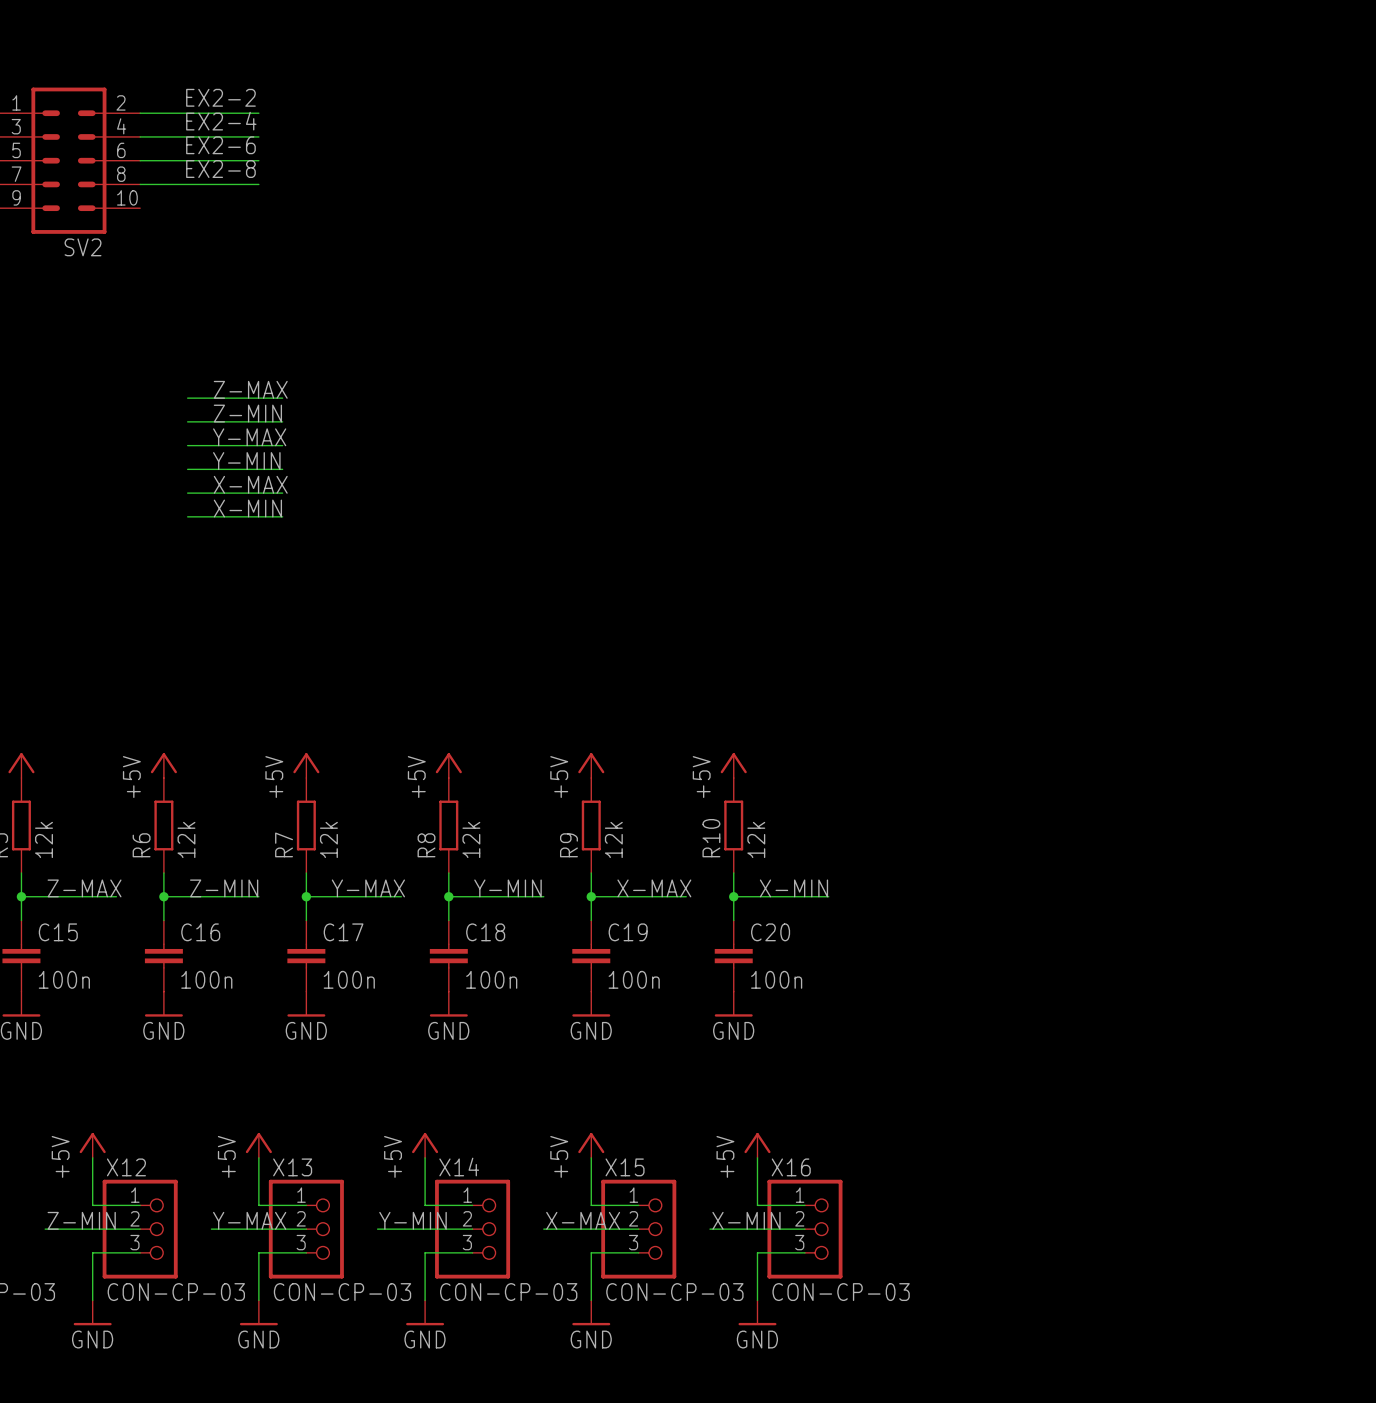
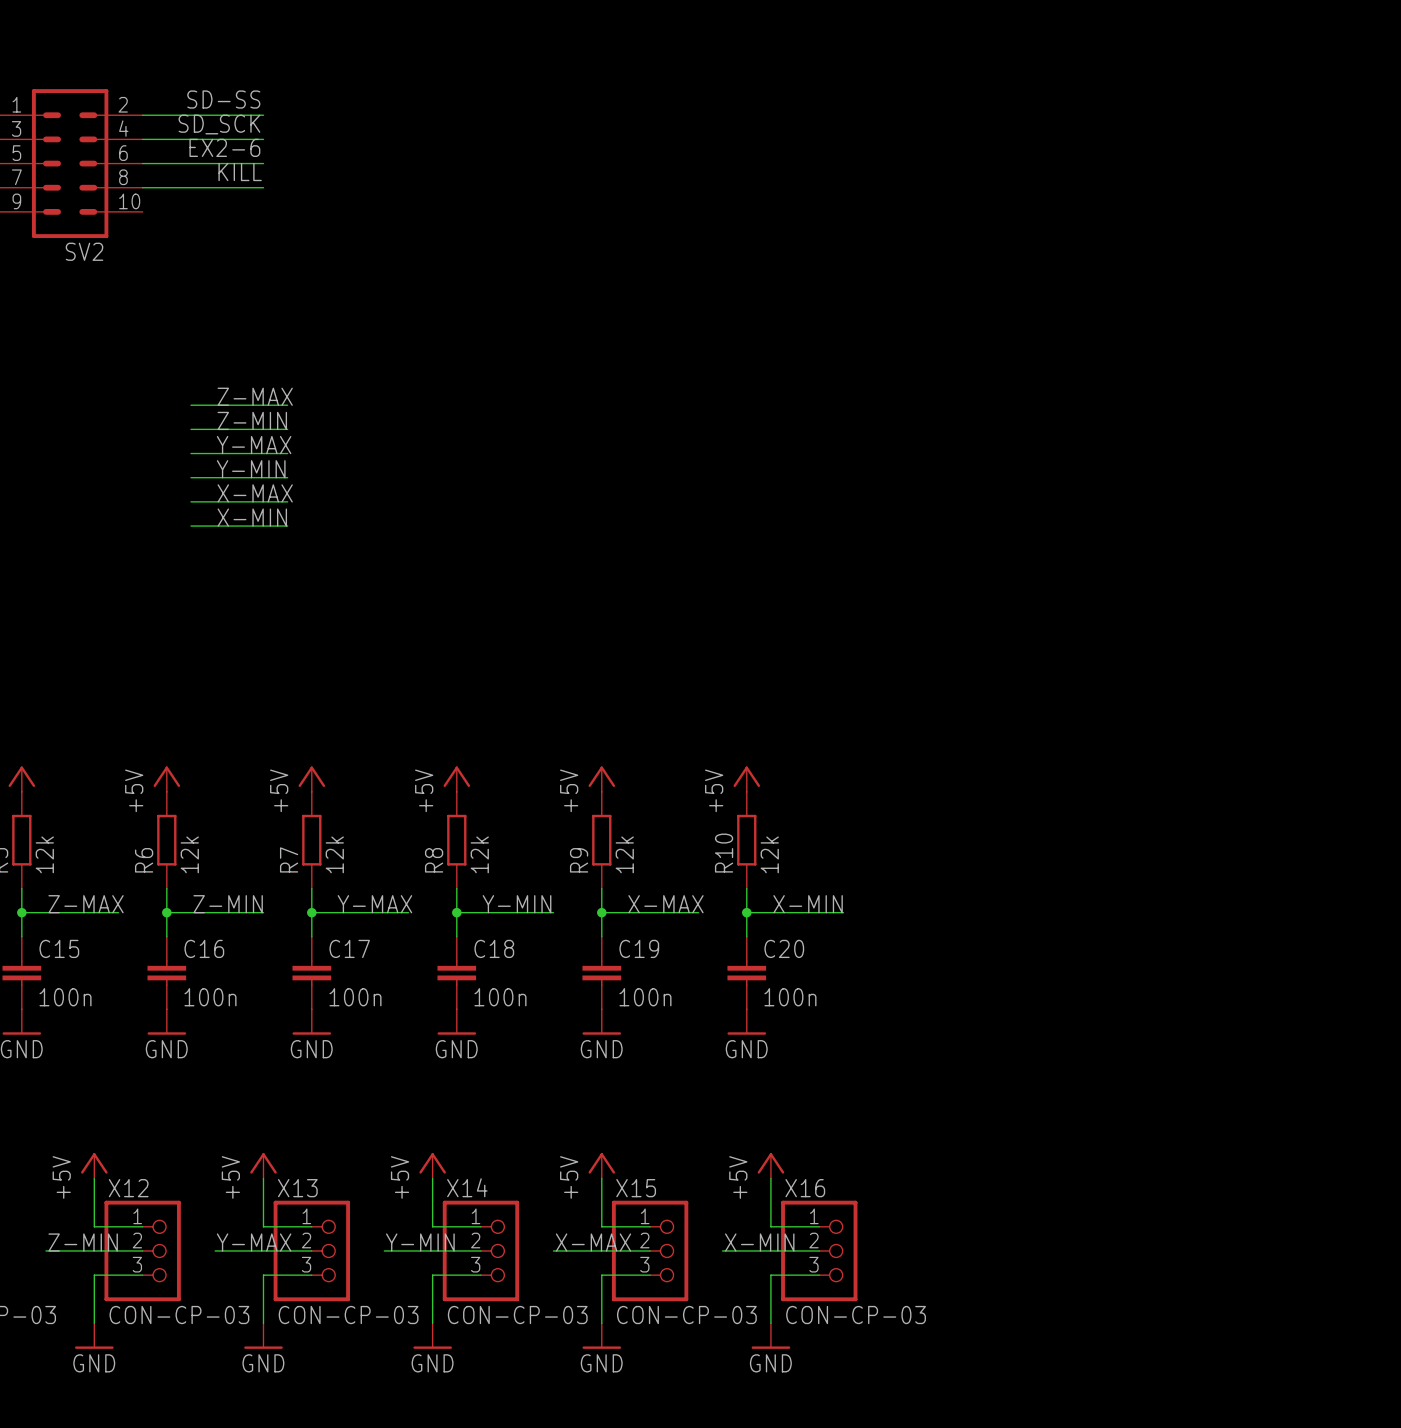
label: EX2-2 (220, 97) -> SD-SS (223, 99)
label: EX2-4 (221, 121) -> SD_SCK (219, 124)
label: EX2-8 (220, 169) -> KILL (240, 172)

